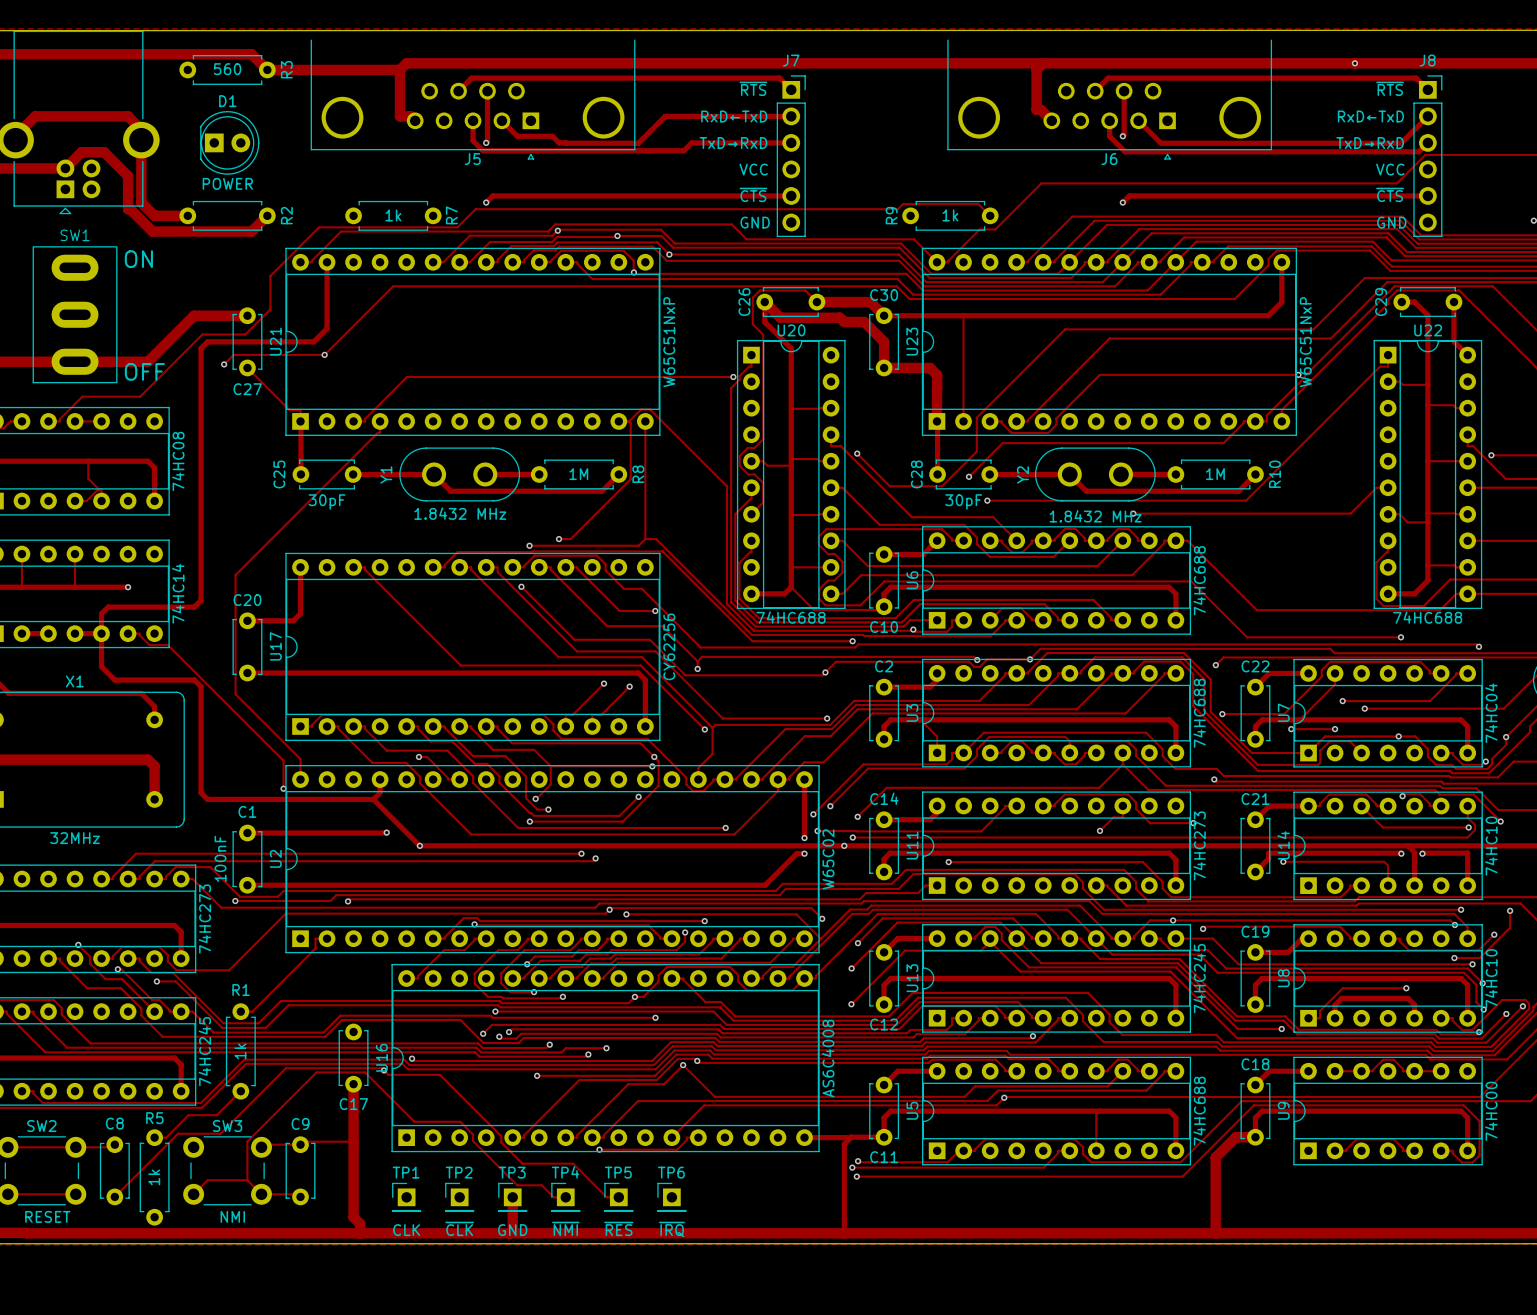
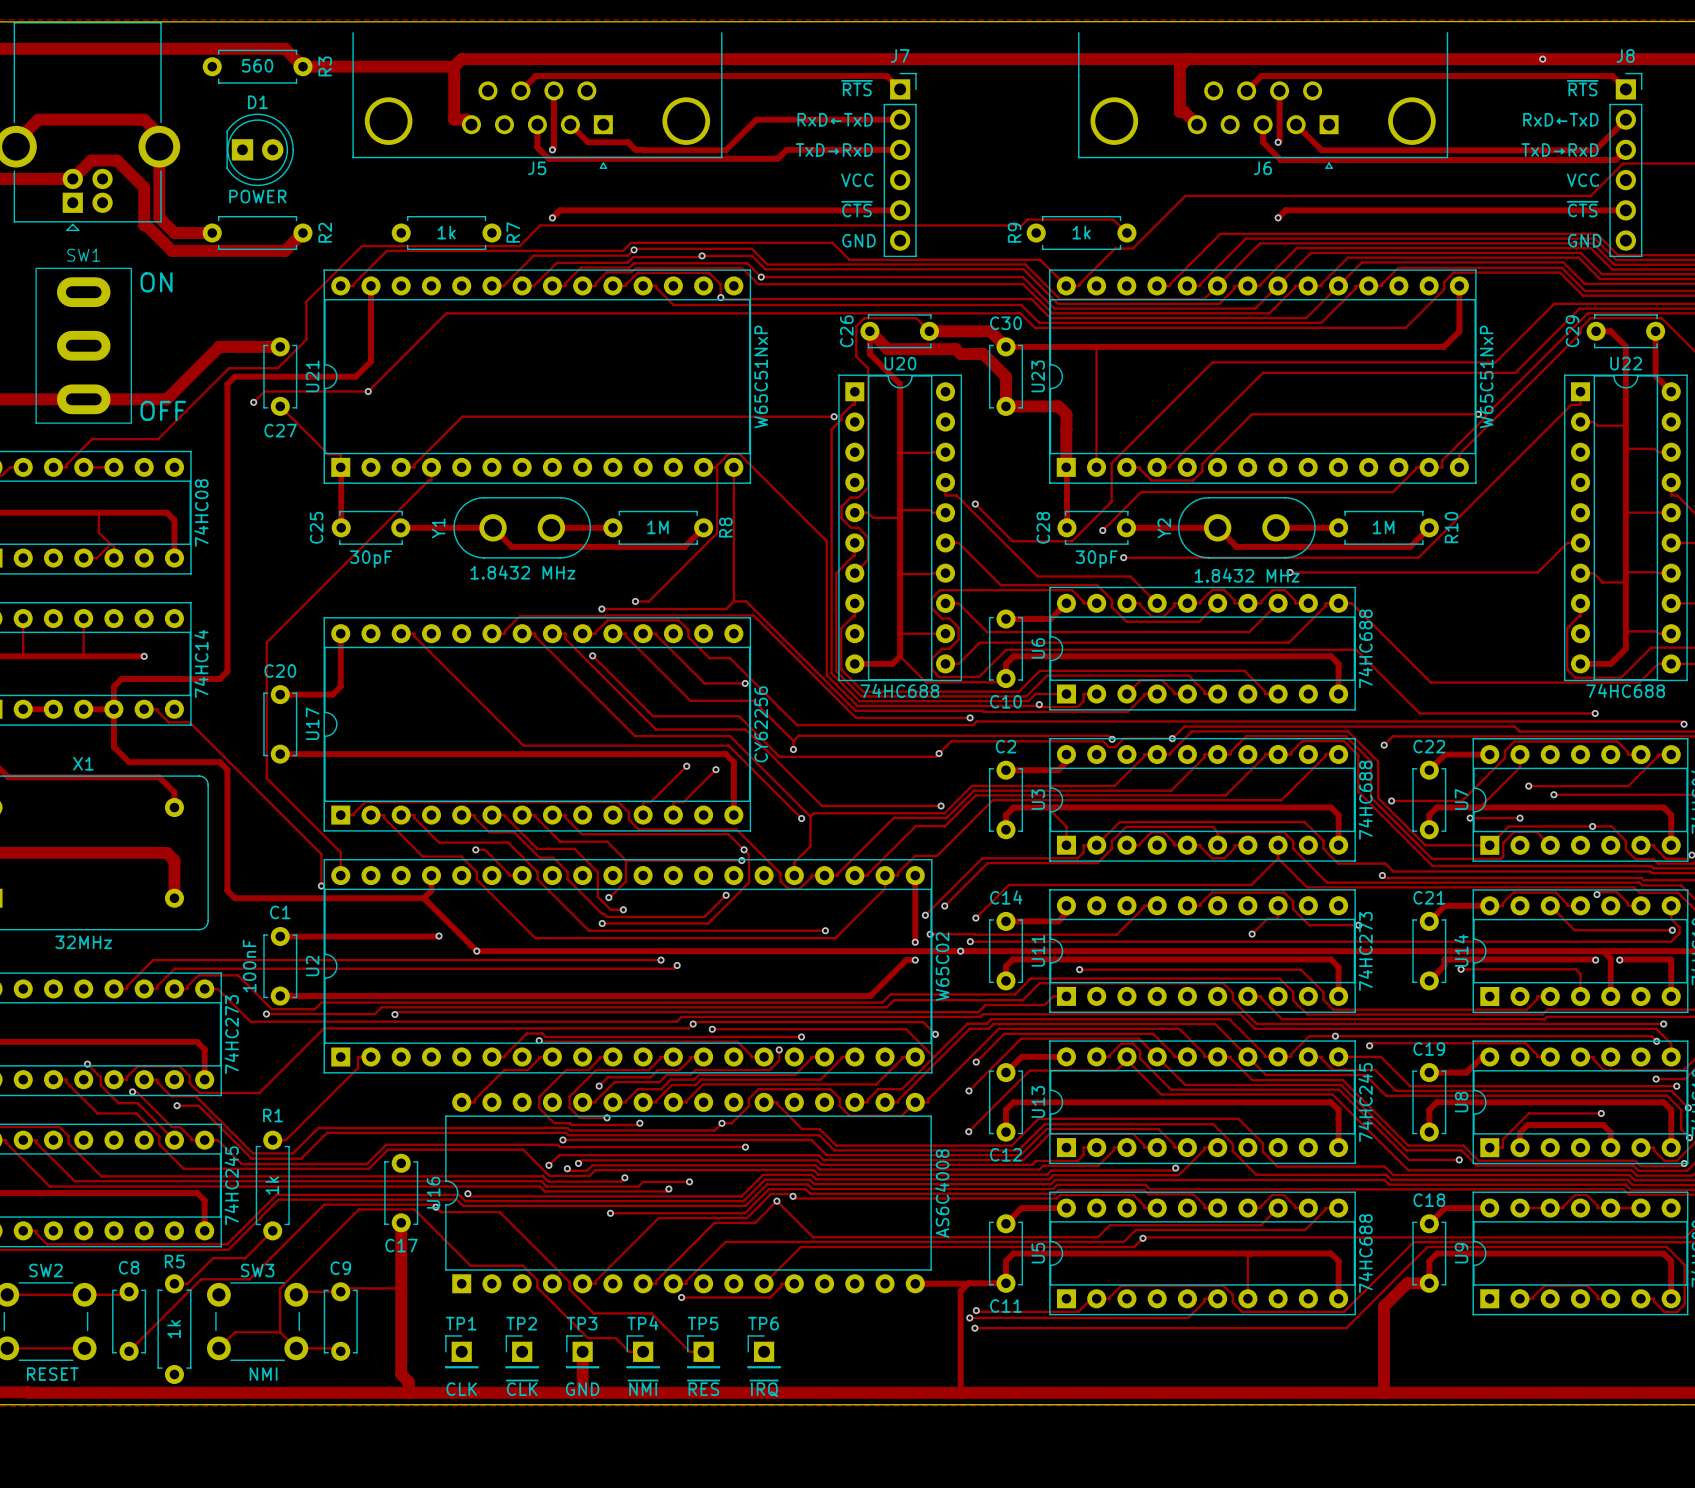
U16 footprint: [391, 963, 820, 1153] -> [445, 1092, 932, 1294]

